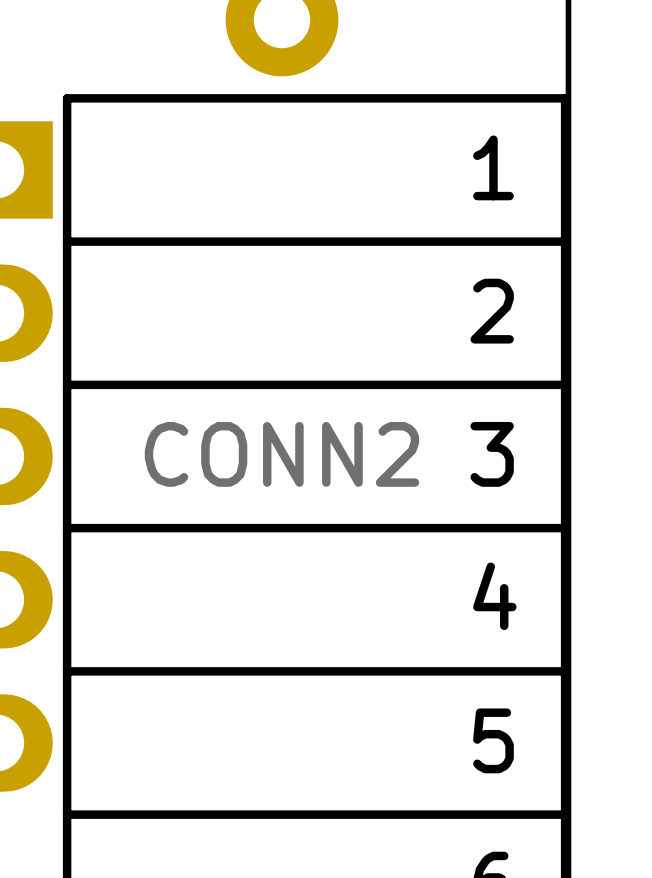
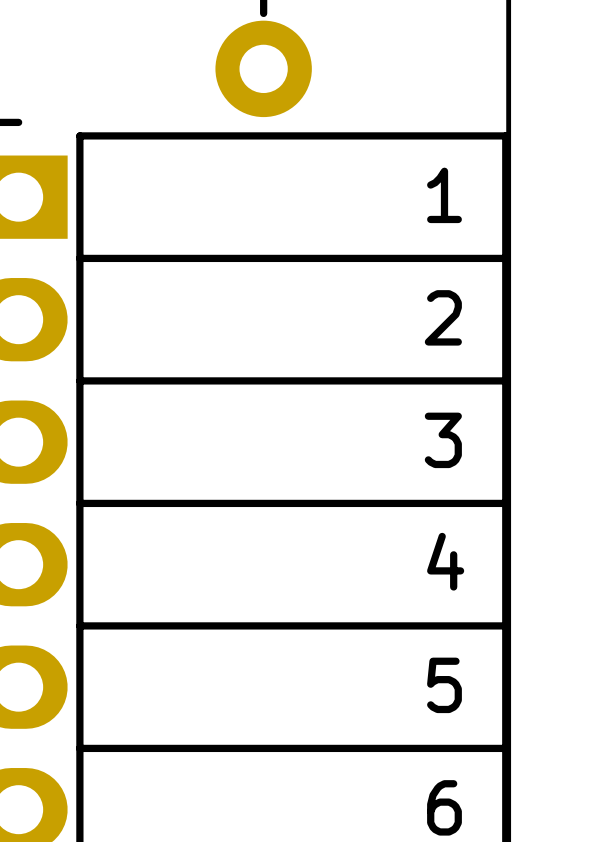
CONN2 name: CONN2 (281, 454) -> none

